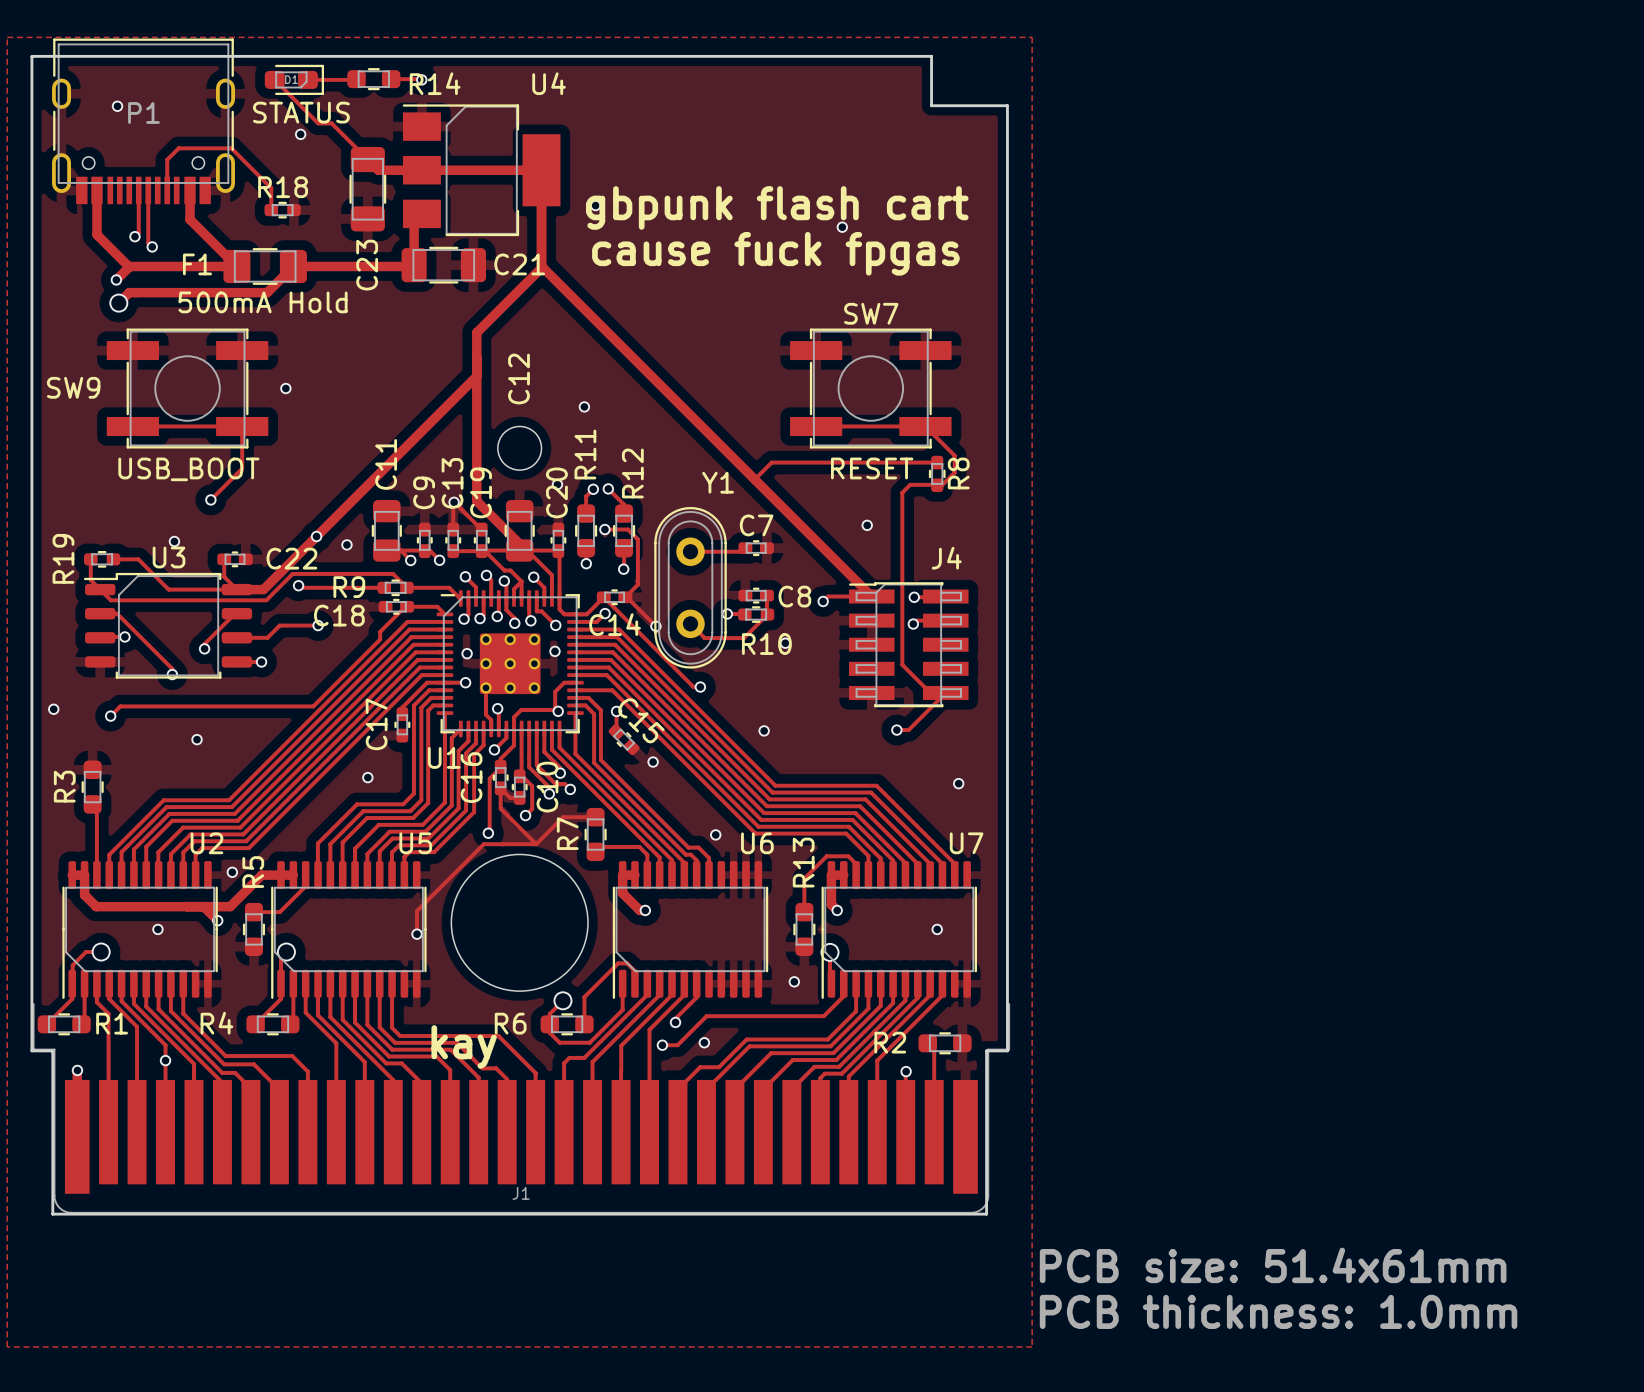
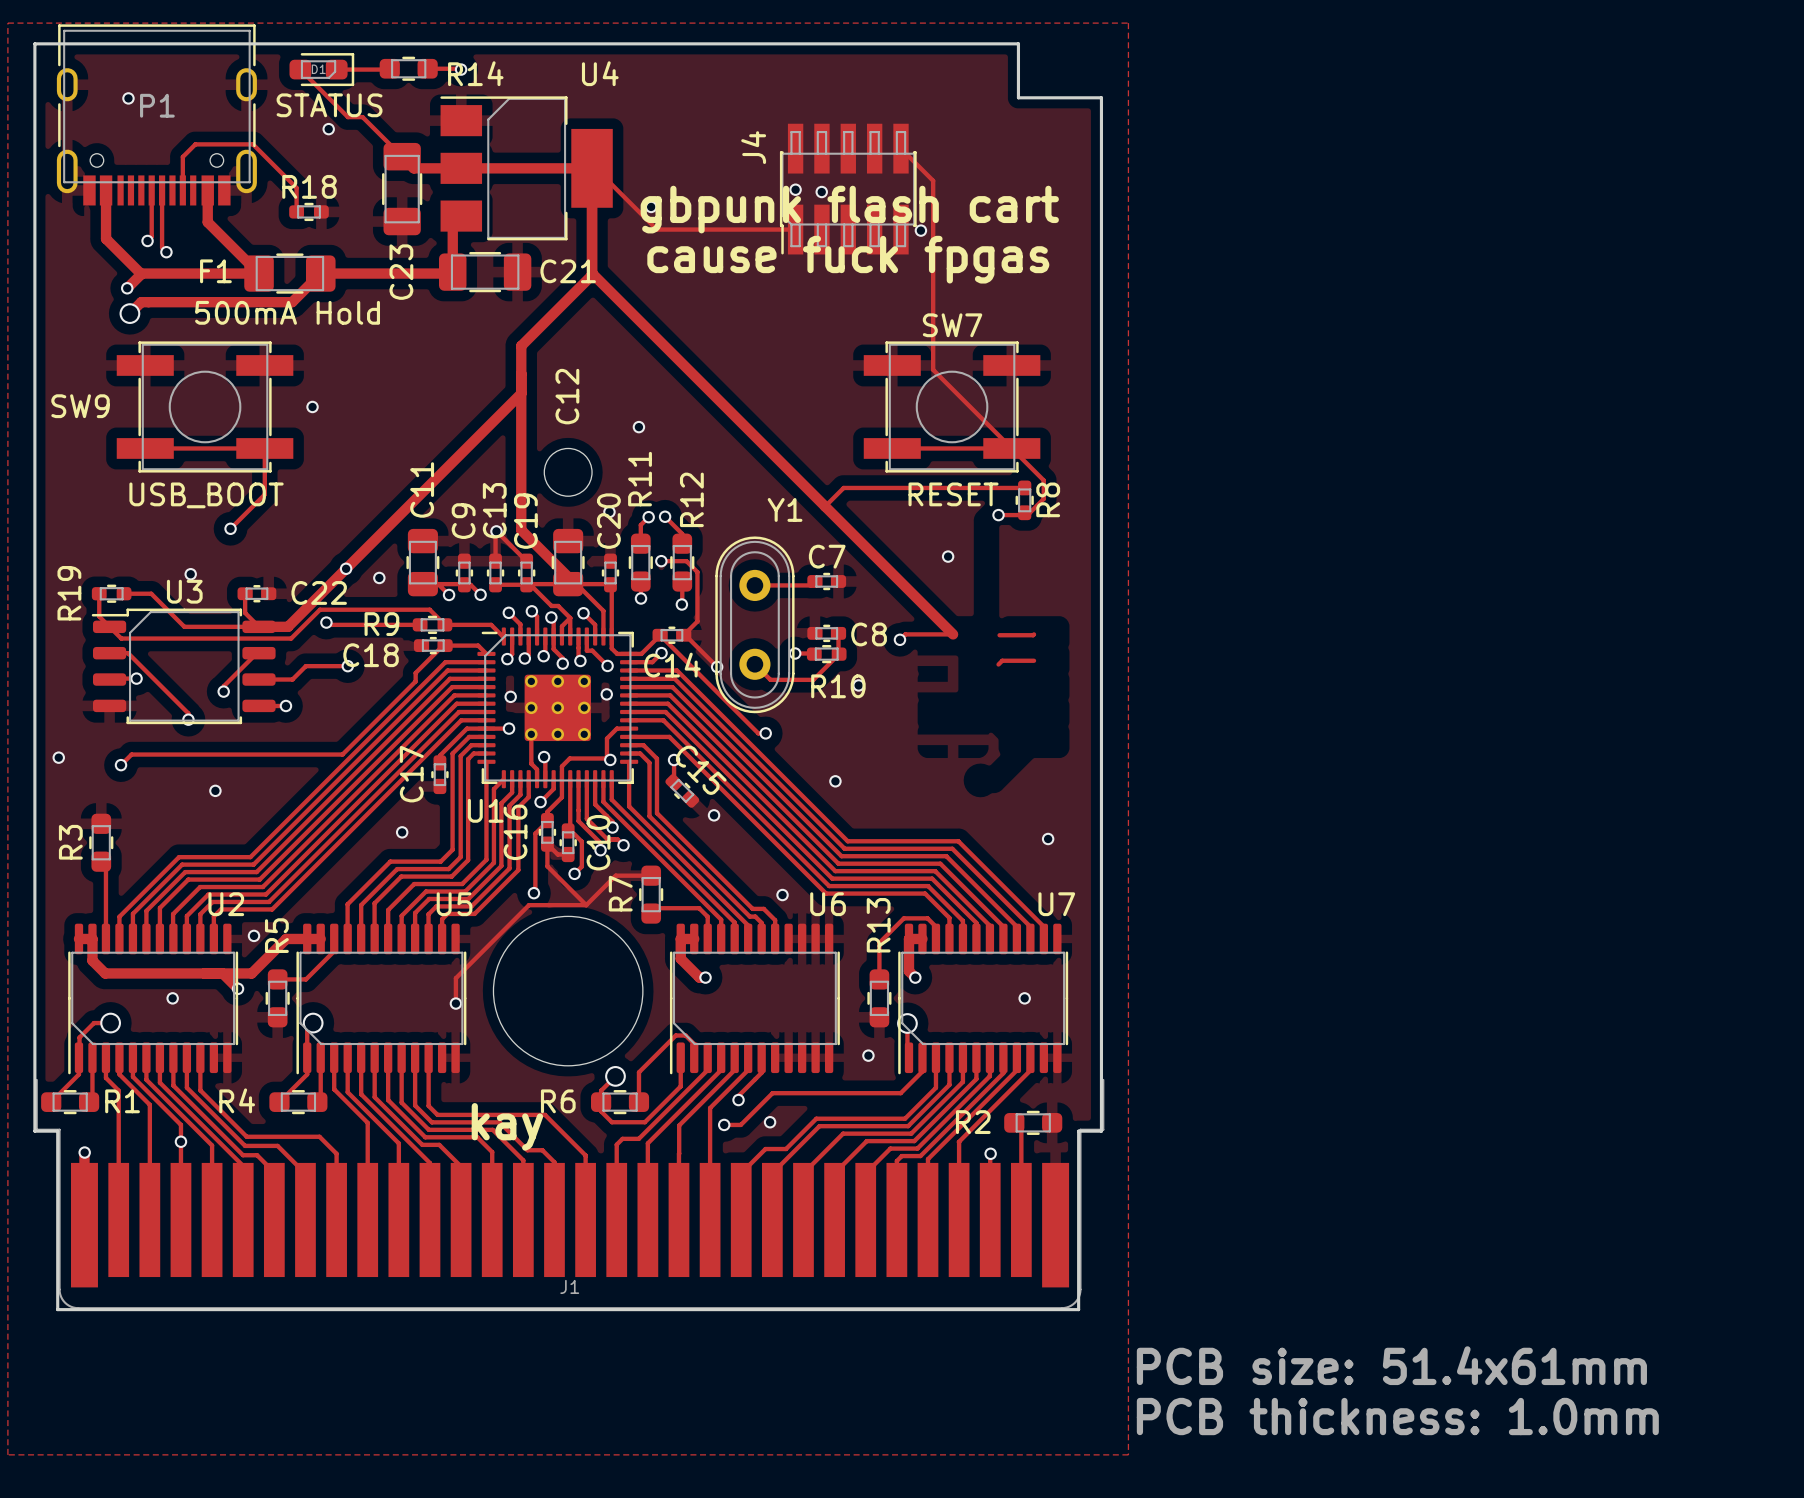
track: none -> (901, 148) (933, 180) (933, 369) (1011, 448)
track: none -> (592, 168) (595, 168) (656, 229) (795, 229)
via: none -> (795, 189)
via: none -> (821, 192)
track: (936, 484) (910, 484) (902, 492) (902, 664) (930, 692) (945, 692) (908, 730) (896, 730) -> (1024, 512) (1022, 515) (998, 515)
via: none -> (998, 515)
via: (914, 597) -> none
via: (913, 624) -> none
J4 rotation: 0° (908, 644) -> 90° counterclockwise (848, 189)
J4 position: (908, 644) -> (848, 189)
via: (896, 730) -> none

